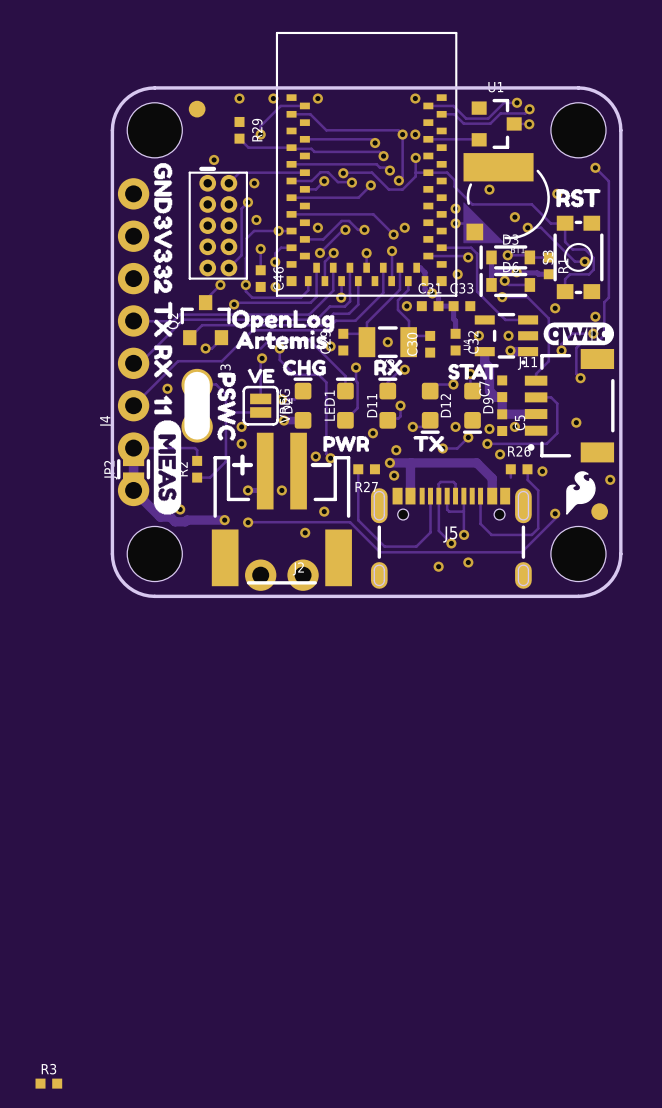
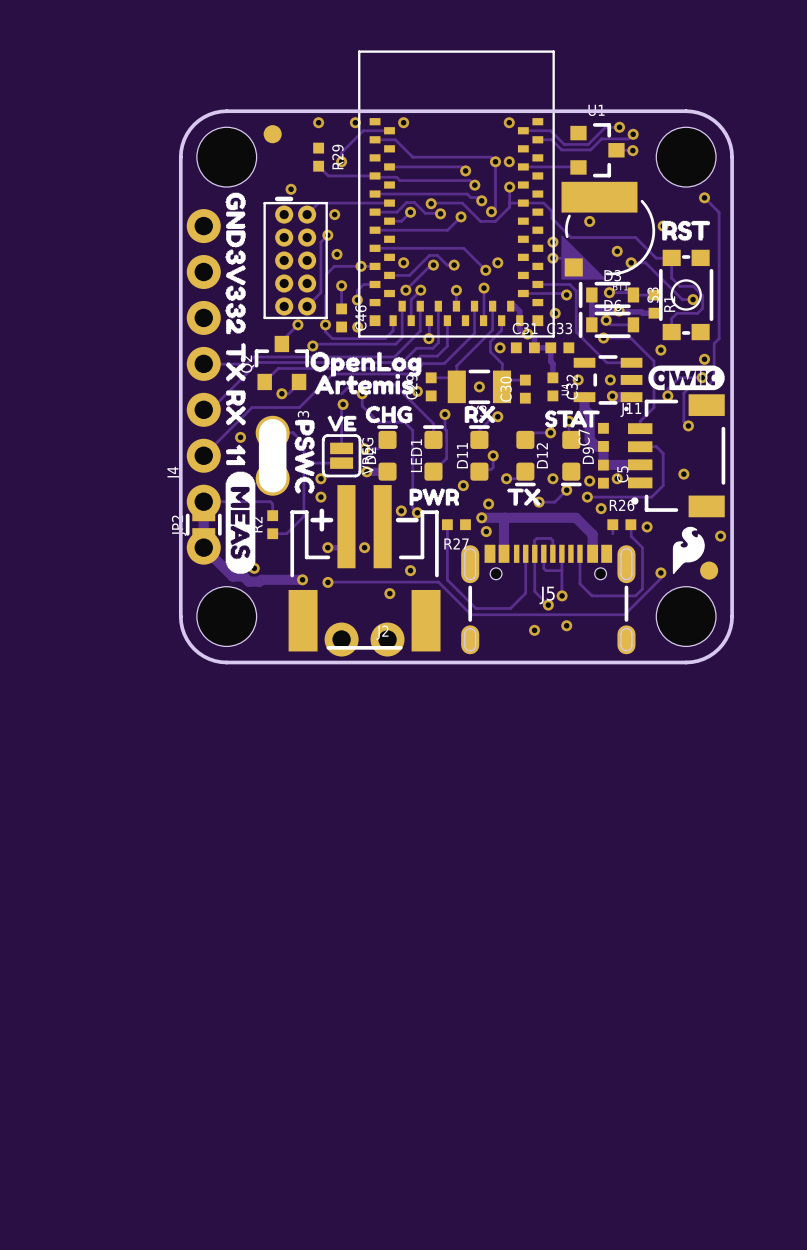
R3: (48, 1083) -> none

